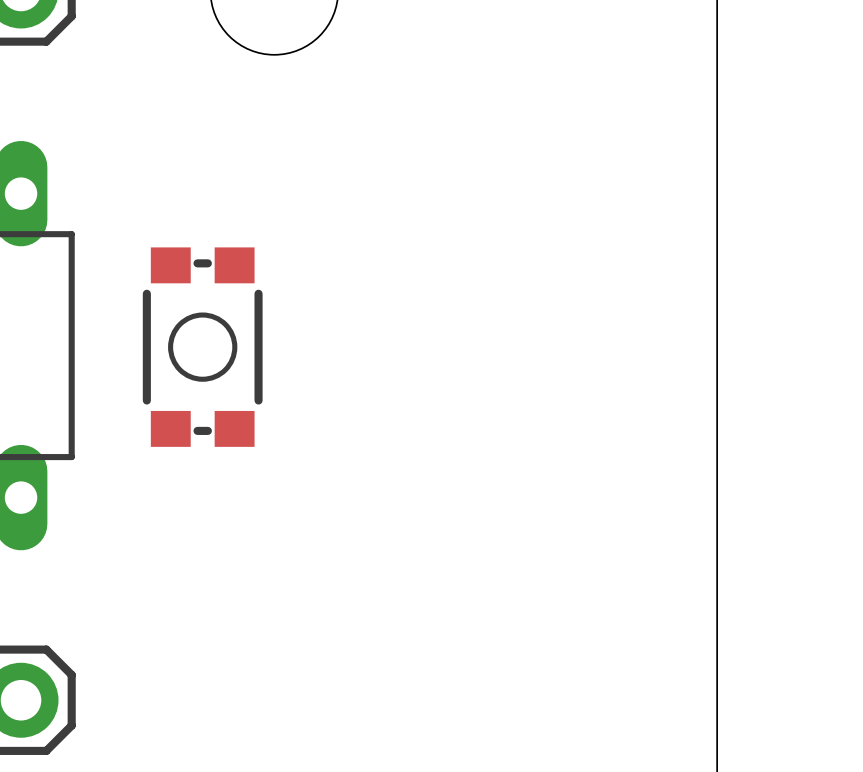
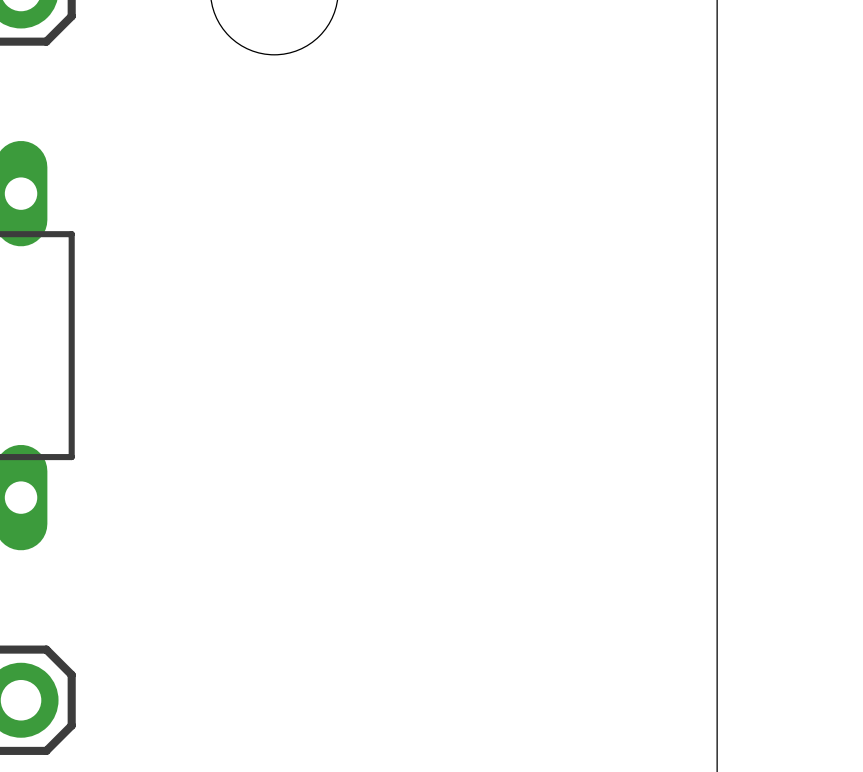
part: (202, 347) -> none

